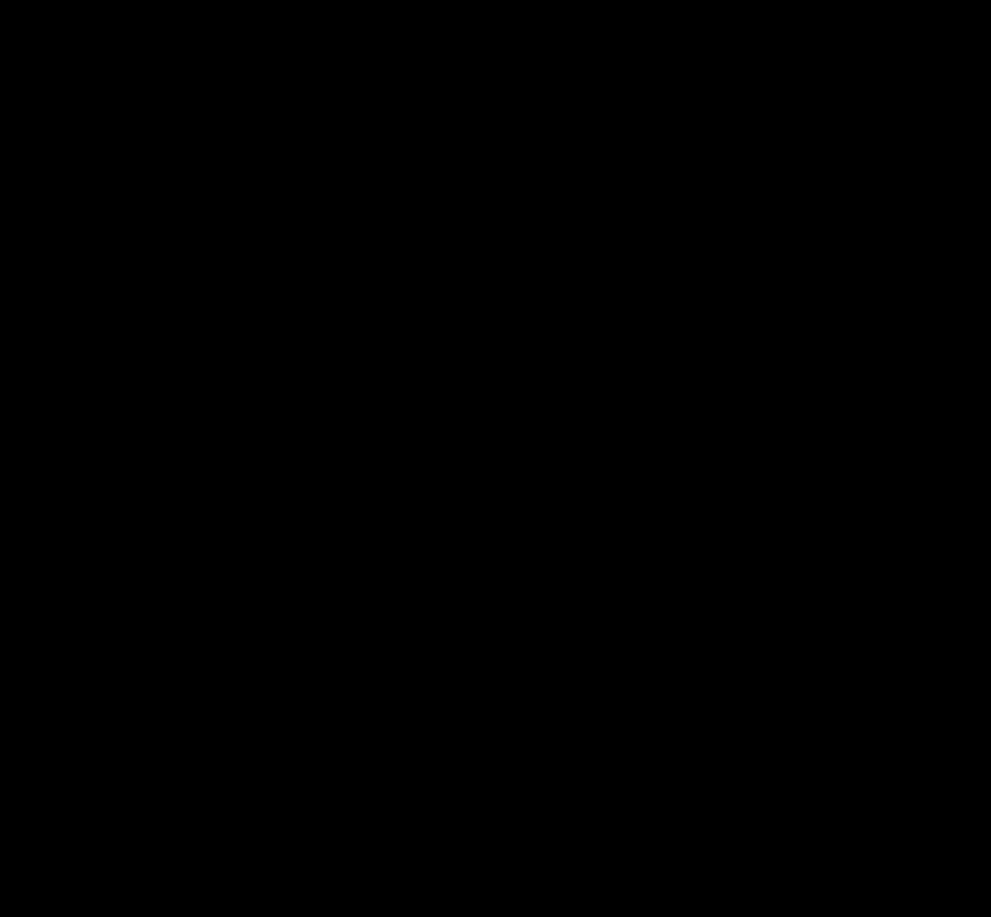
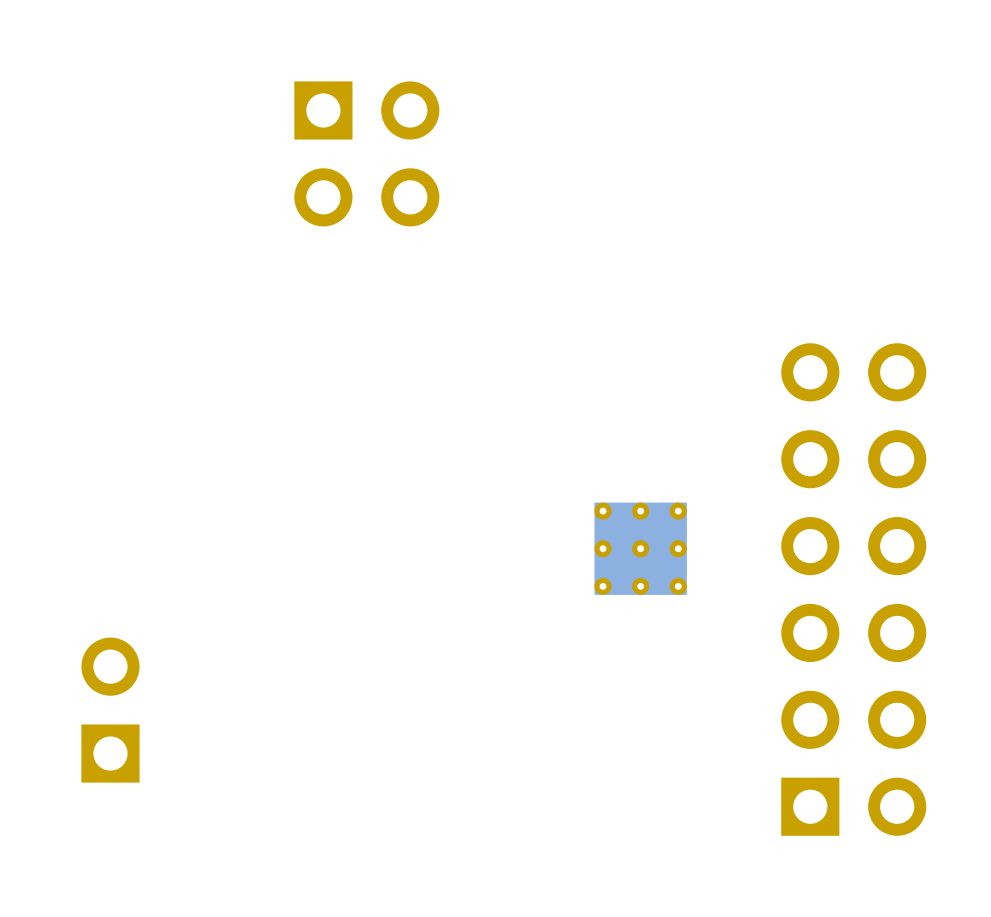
part: none -> (366, 153)
part: none -> (640, 548)
part: none -> (853, 589)
part: none -> (110, 710)

